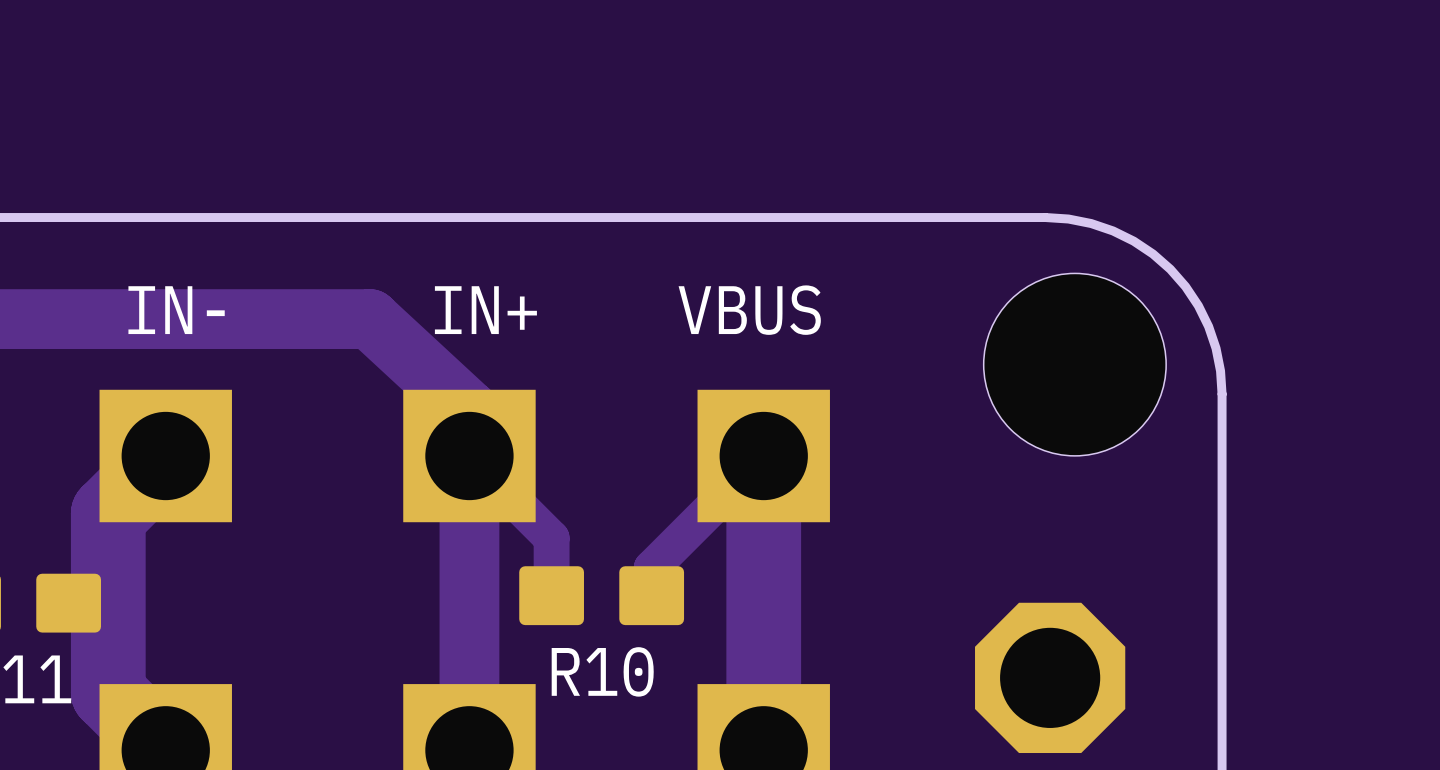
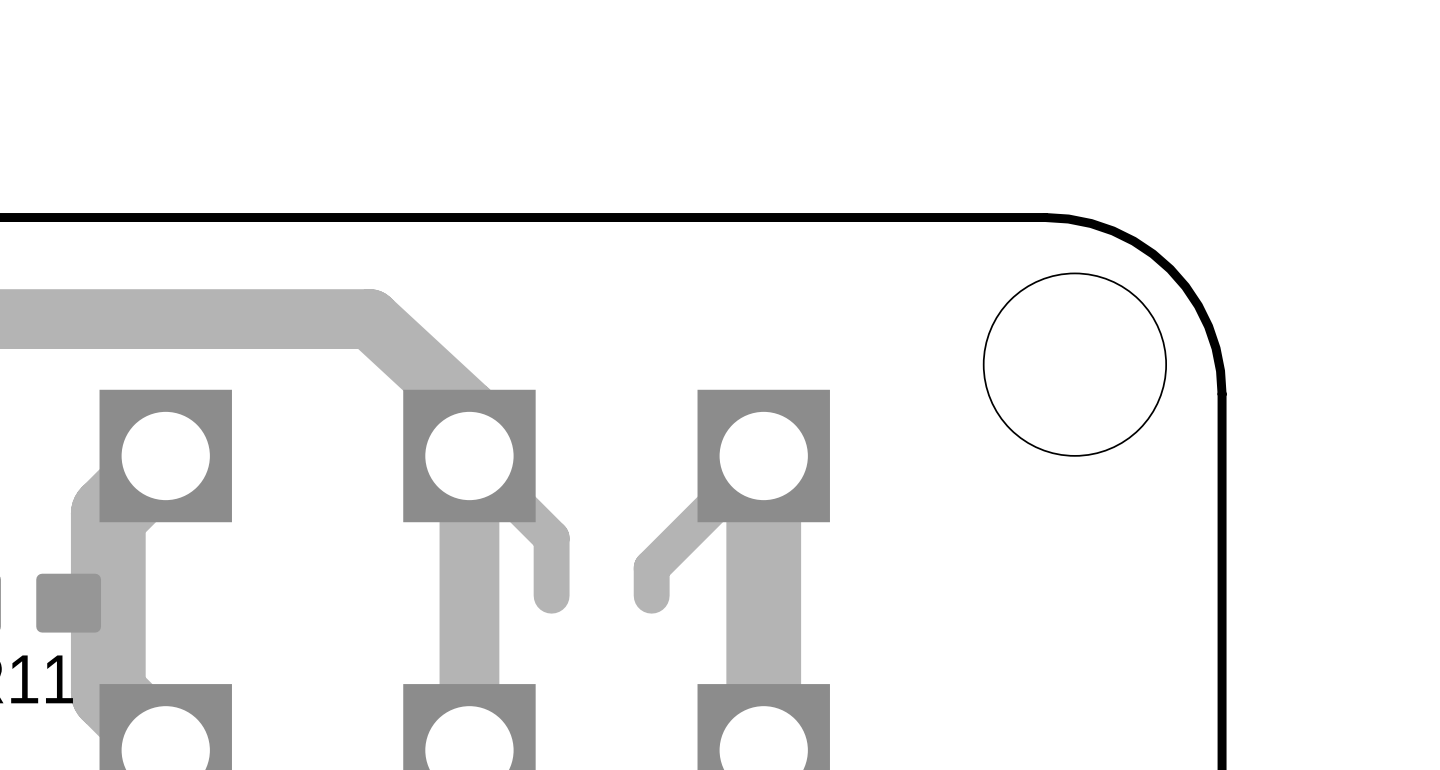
text: IN- (176, 310) -> none
text: IN+ (485, 310) -> none
text: VBUS (749, 310) -> none
R10: (601, 595) -> none
part: (1050, 677) -> none

